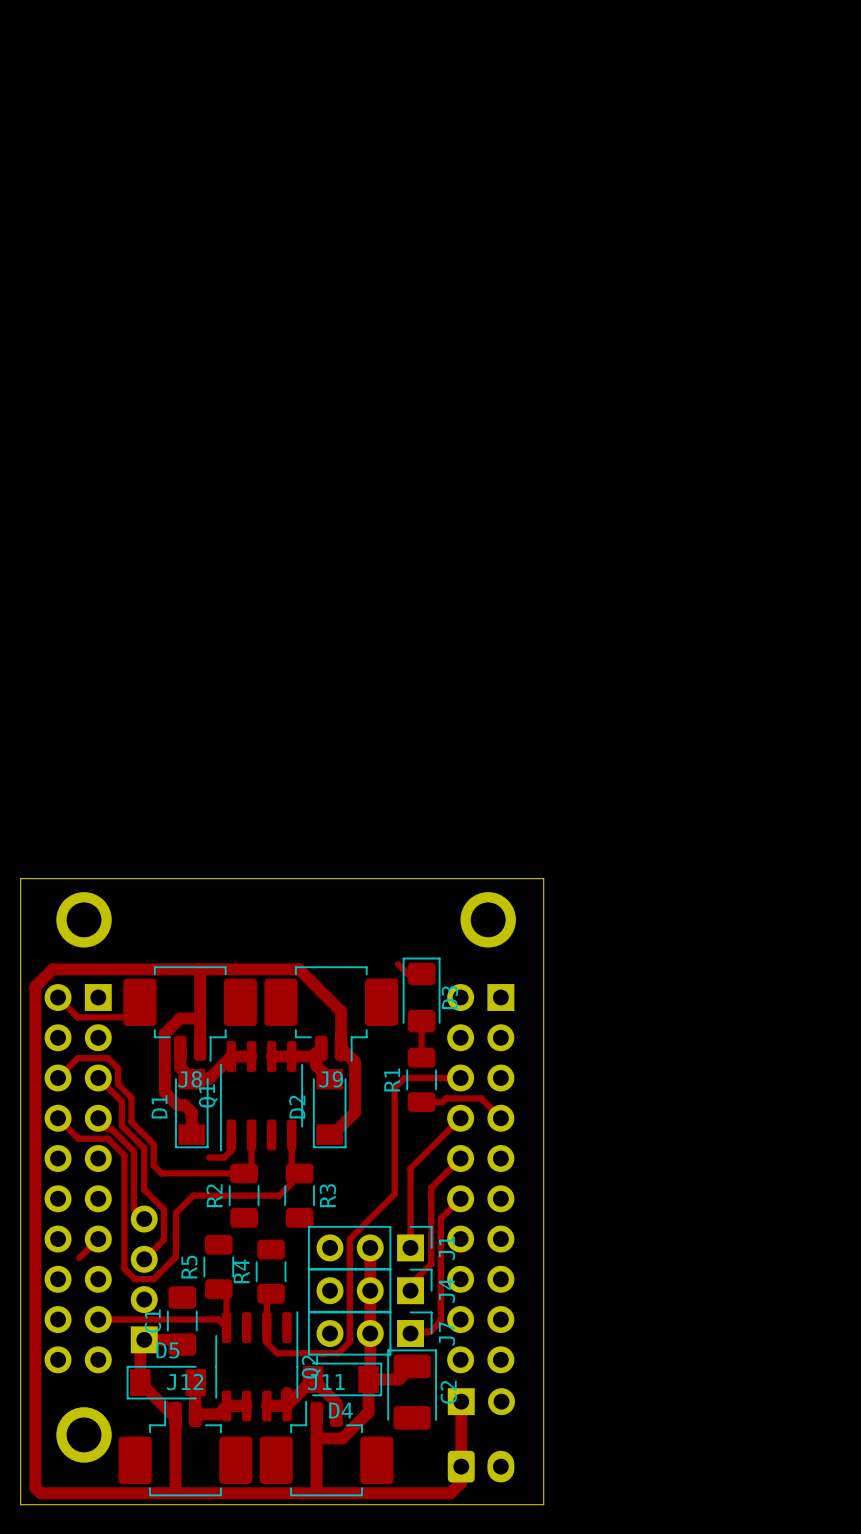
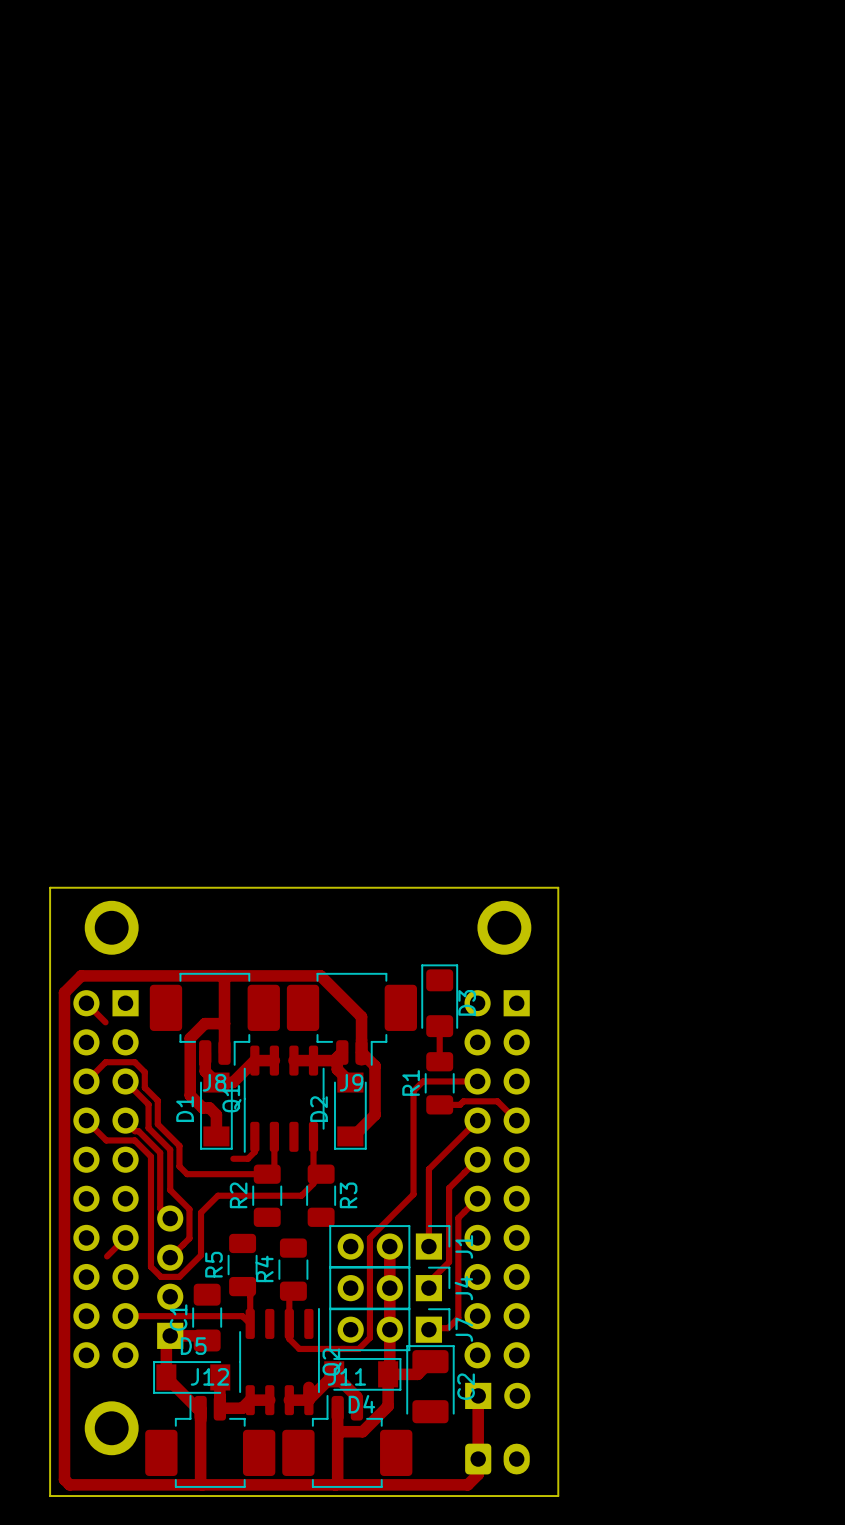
top track: (398, 964) (407, 973) (421, 973) -> none
top track: (139, 1002) (124, 1017) (77, 1017) -> none

